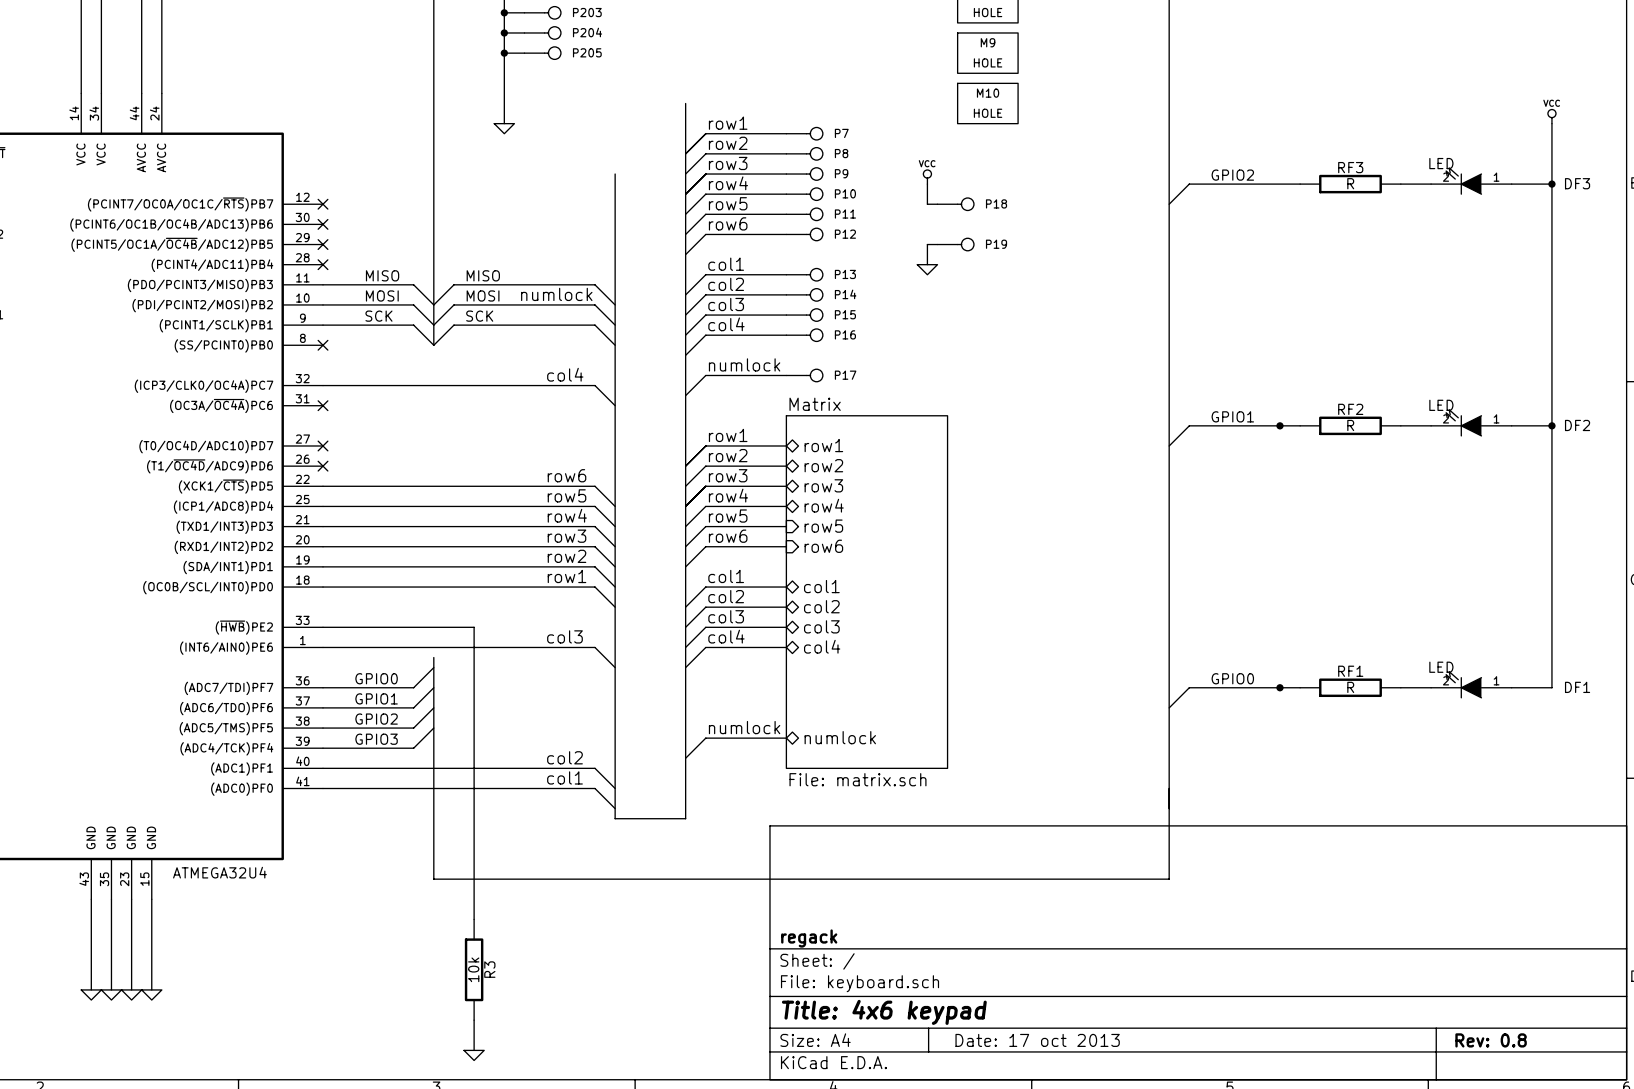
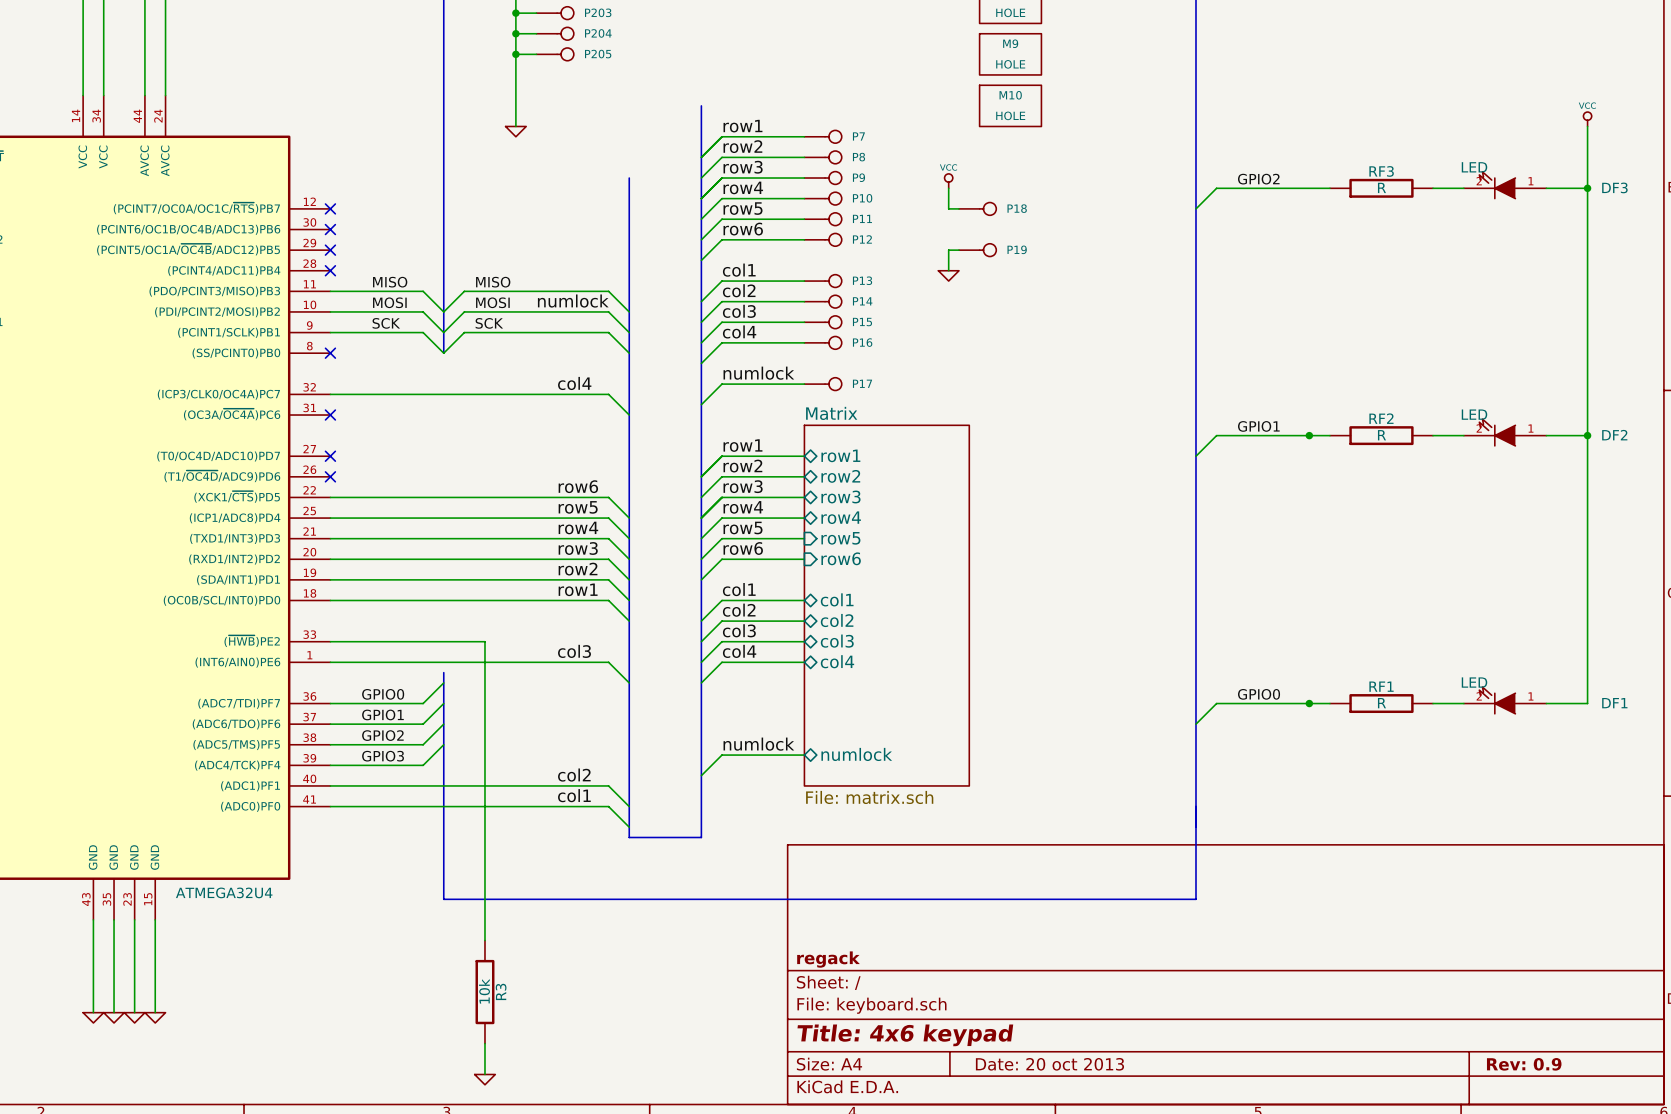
title block: Date: 17 oct 2013 (1037, 1040) -> Date: 20 oct 2013 (1049, 1064)
title block: Rev: 0.8 (1491, 1040) -> Rev: 0.9 (1524, 1064)

